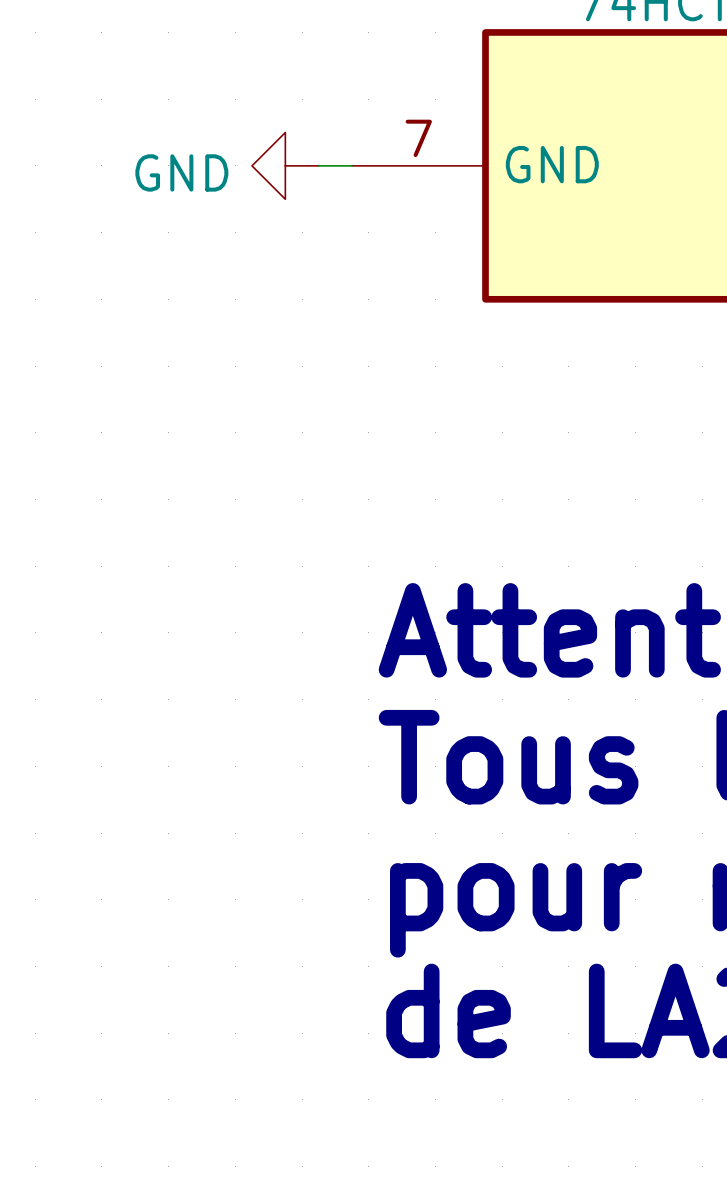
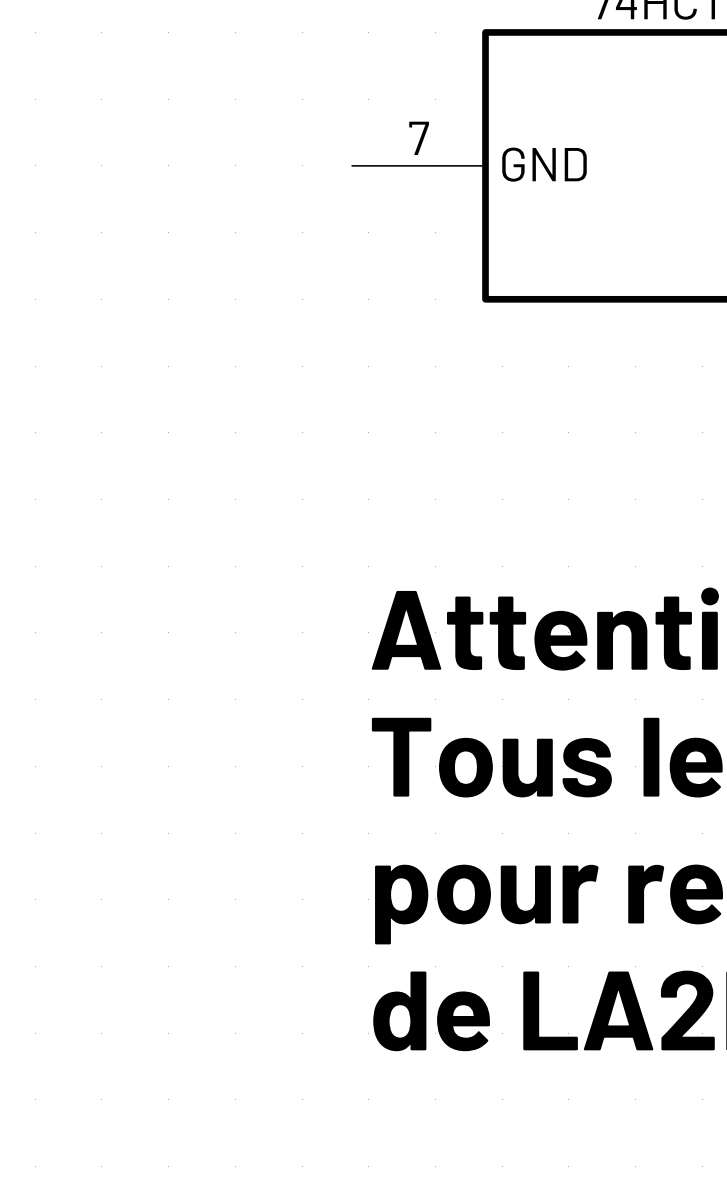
power symbol: GND (285, 165) -> none
wire: (318, 165) (352, 165) -> none

